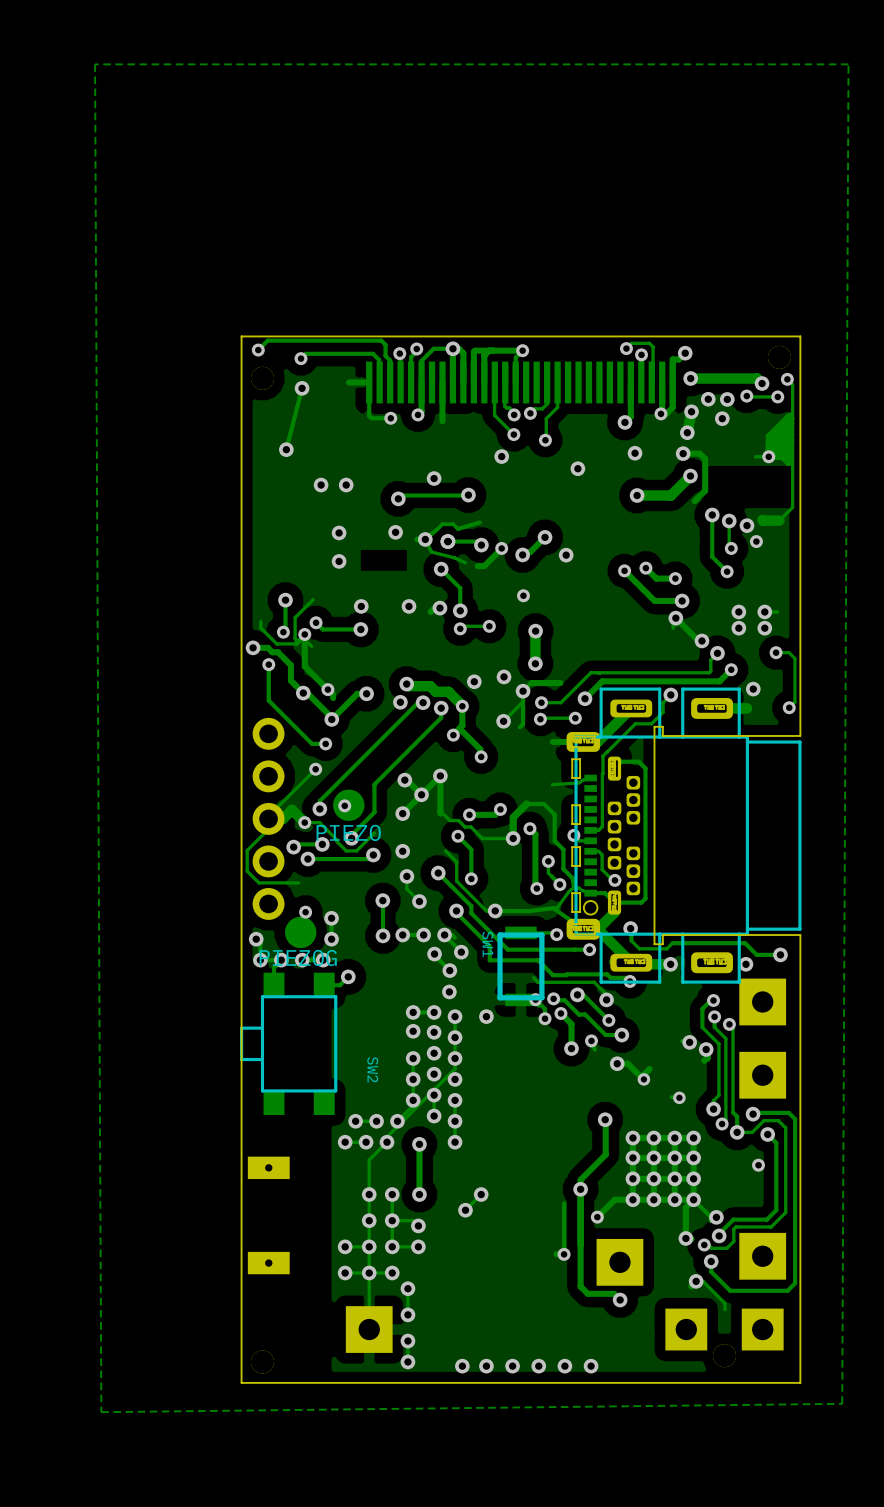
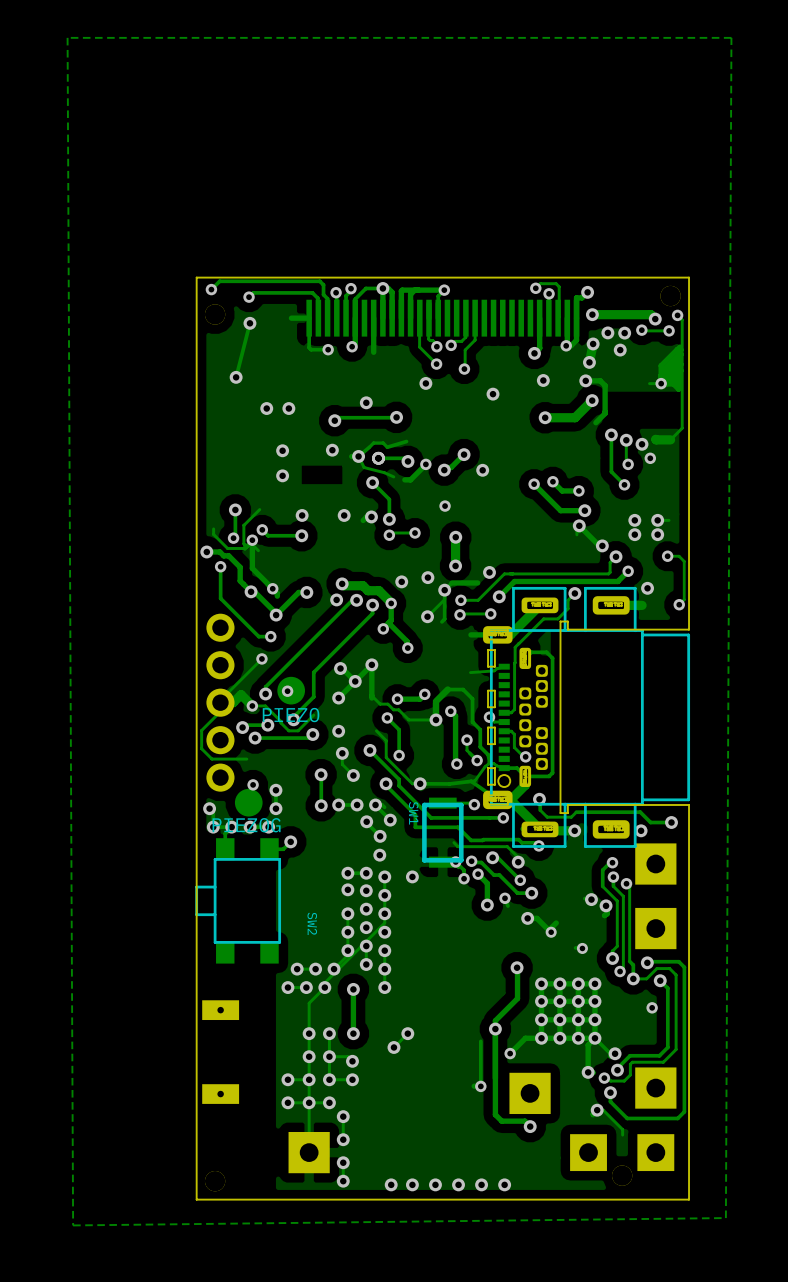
via: none -> (489, 572)

